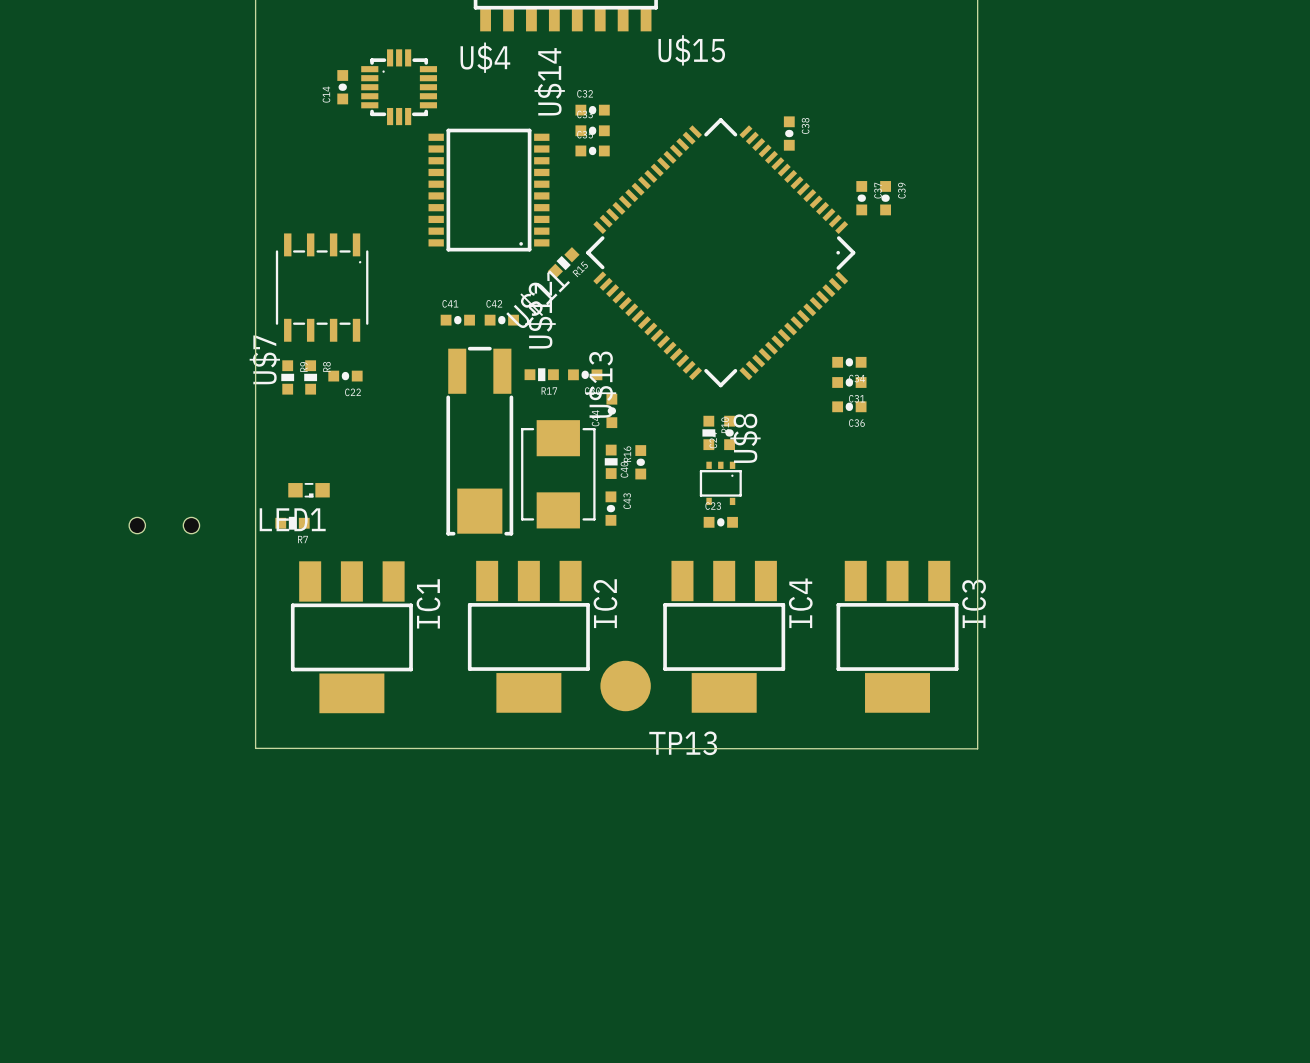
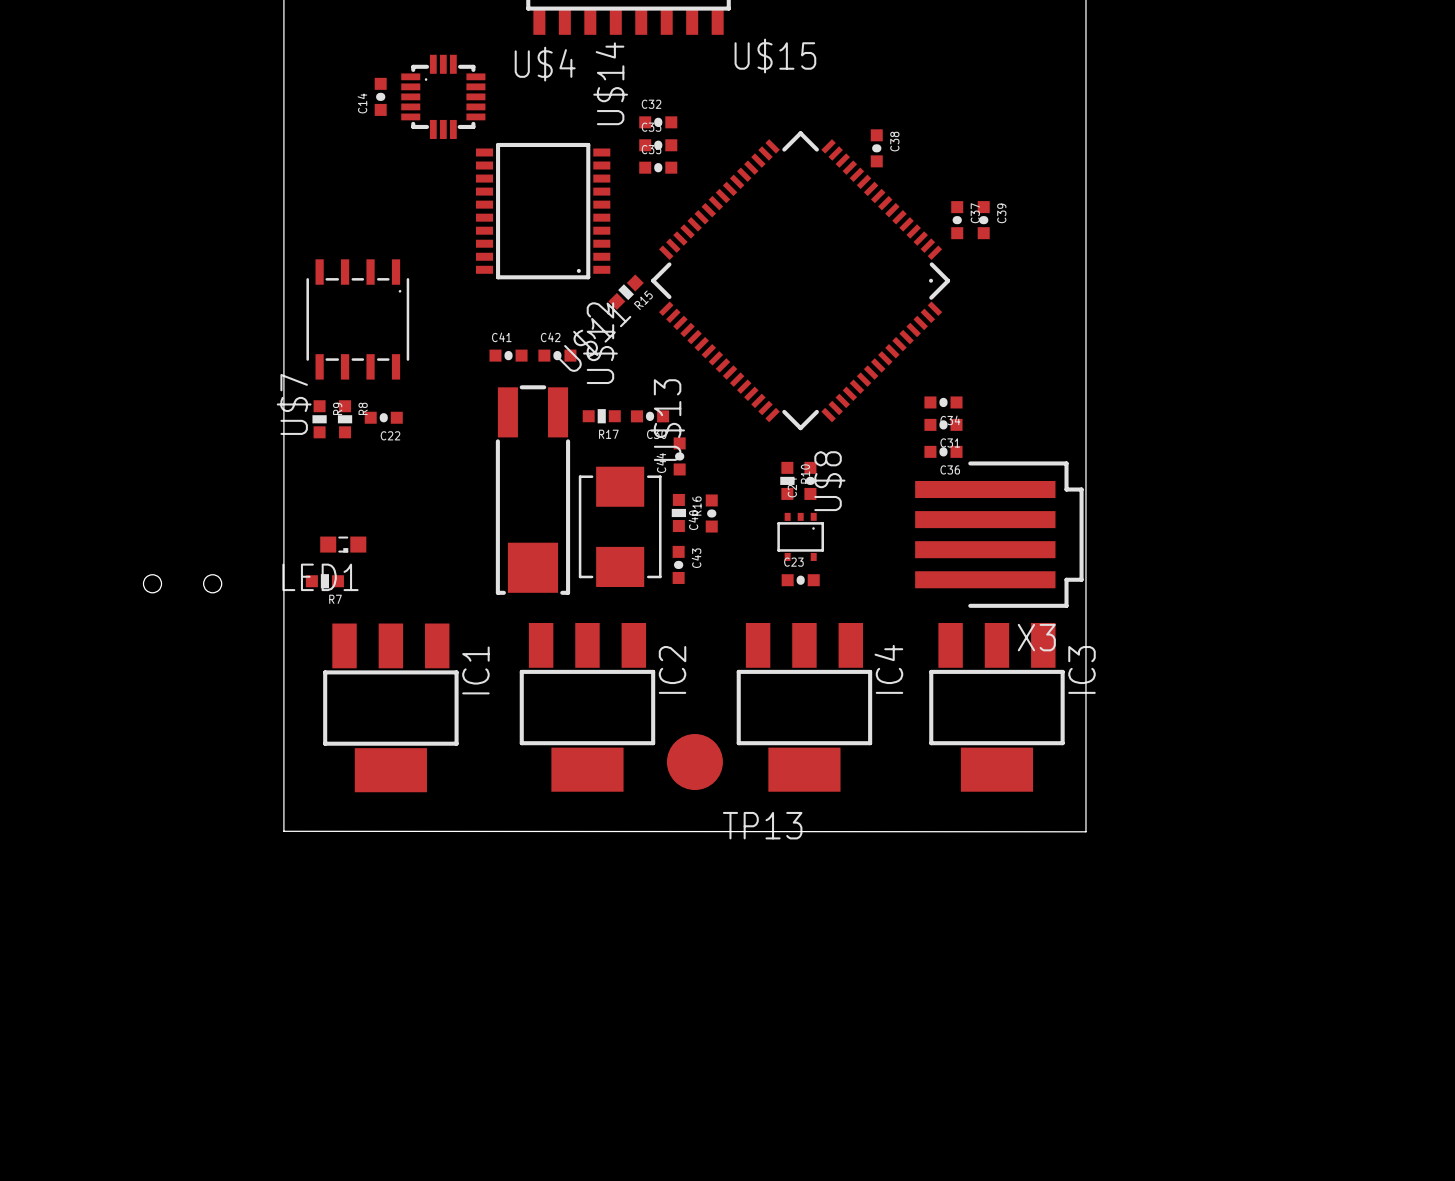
X3: none -> (999, 534)

